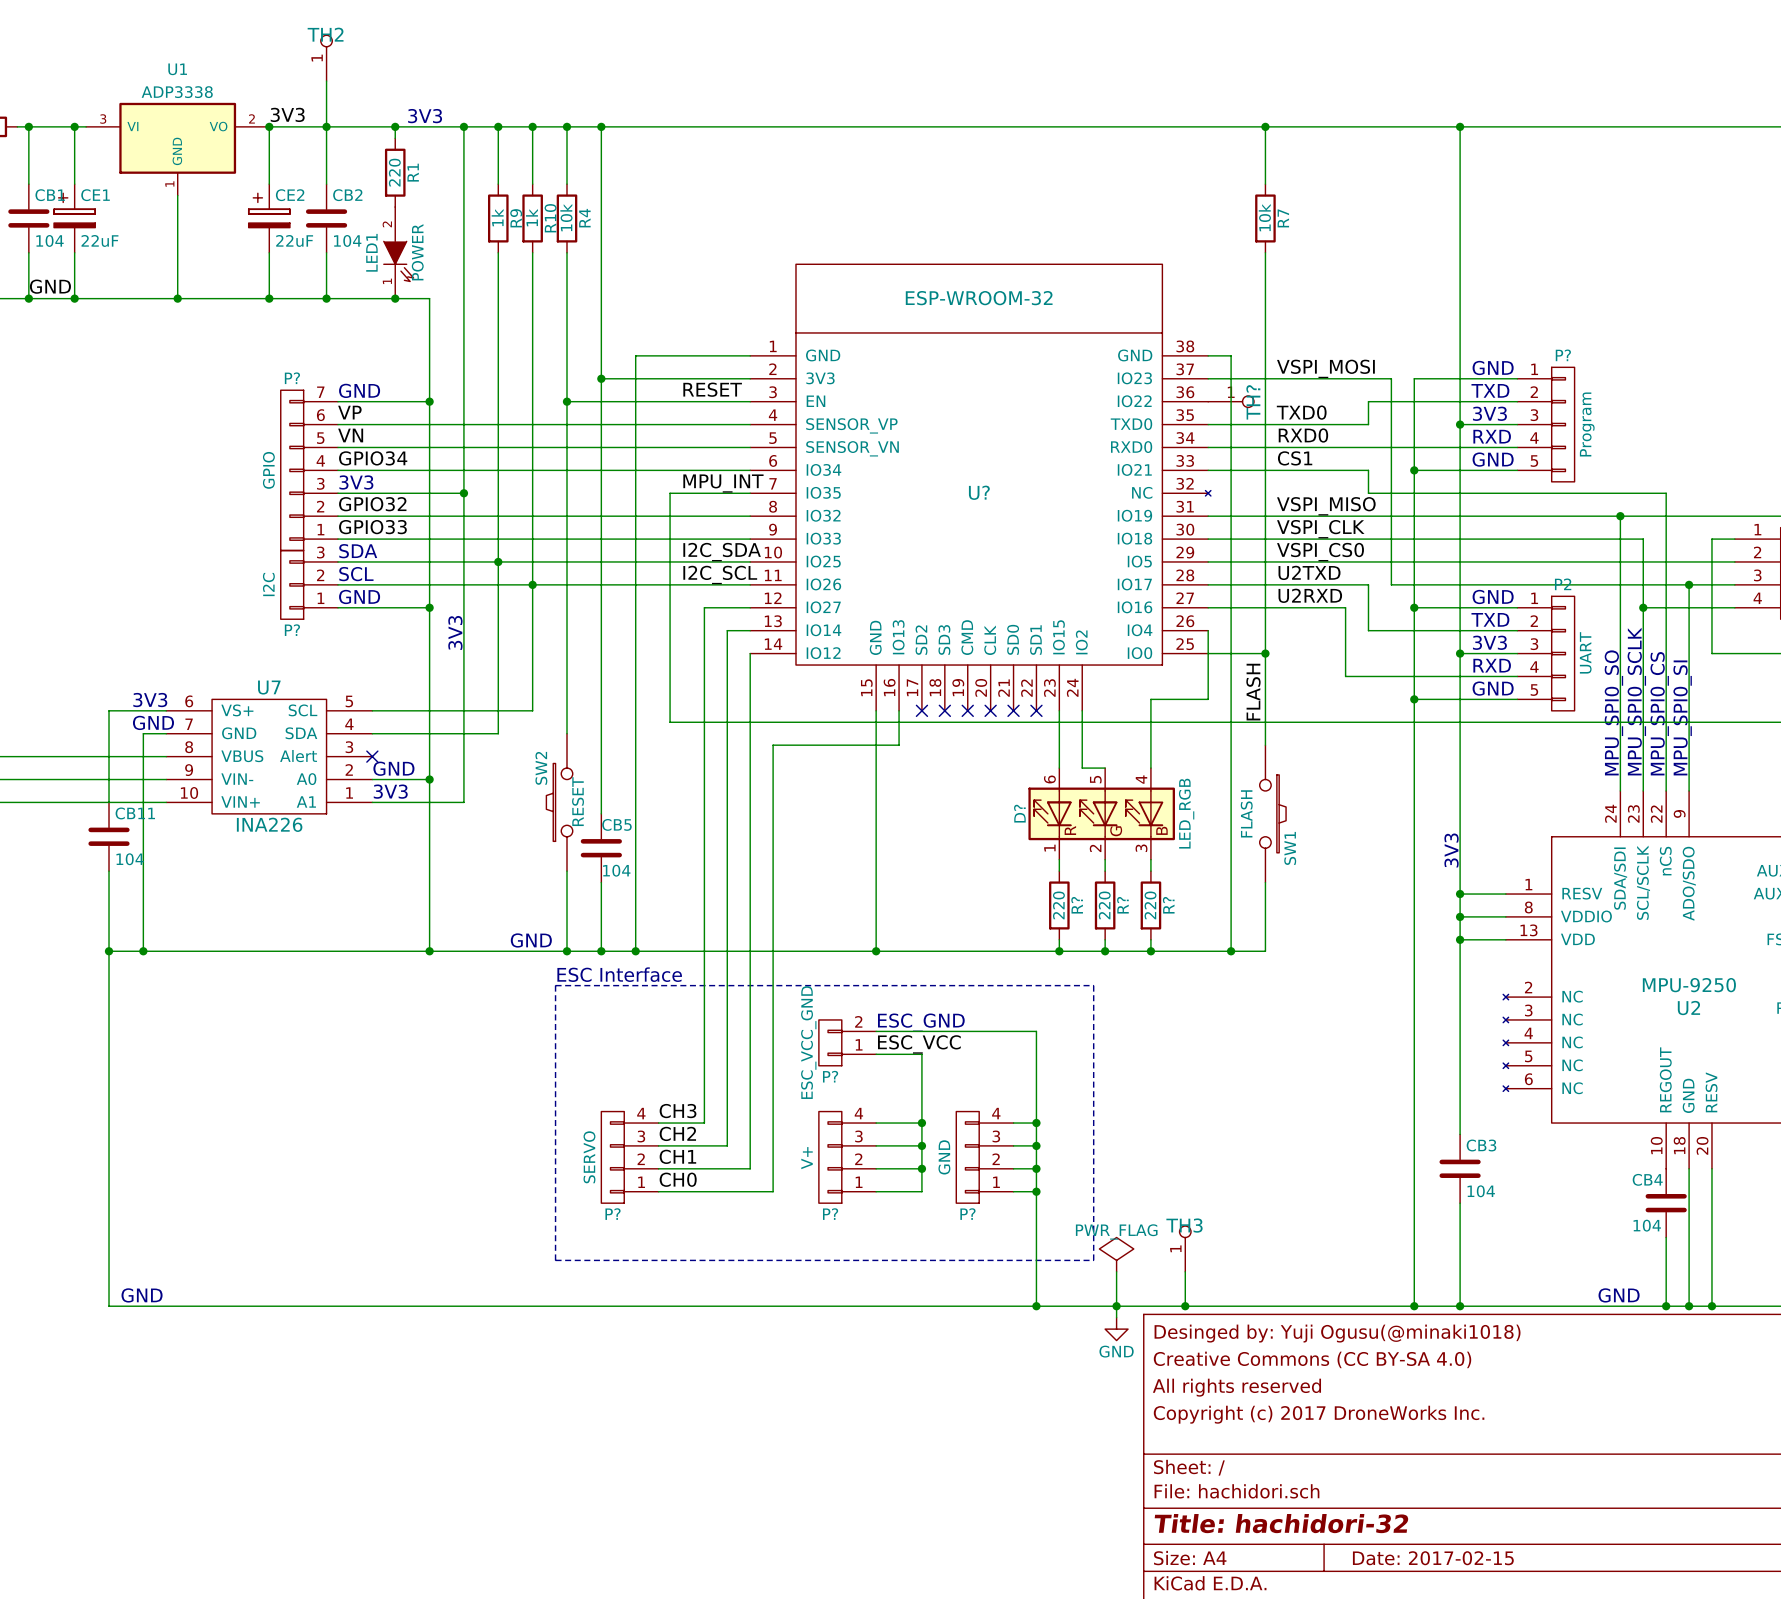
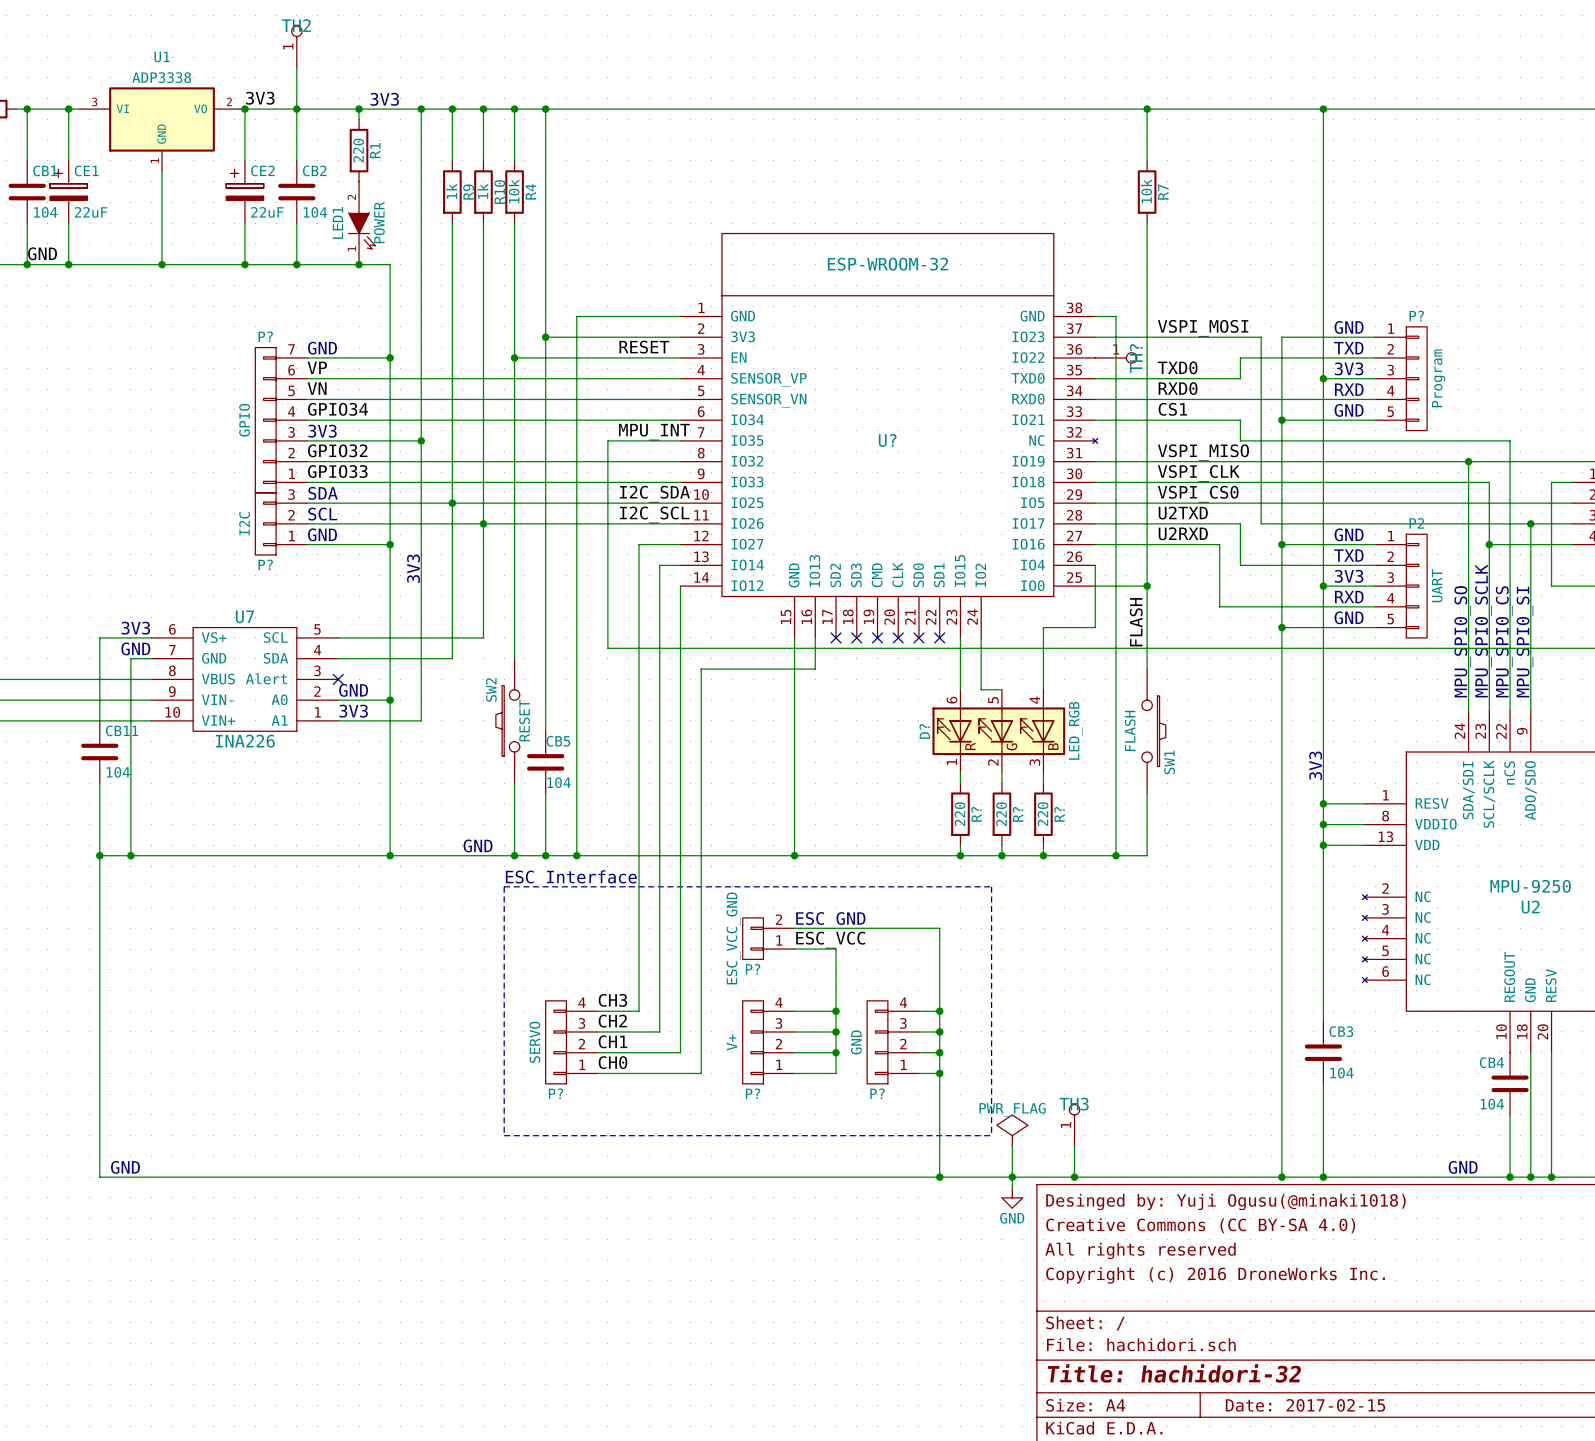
title block: Copyright (c) 2017 DroneWorks Inc. (1319, 1414) -> Copyright (c) 2016 DroneWorks Inc. (1215, 1275)

